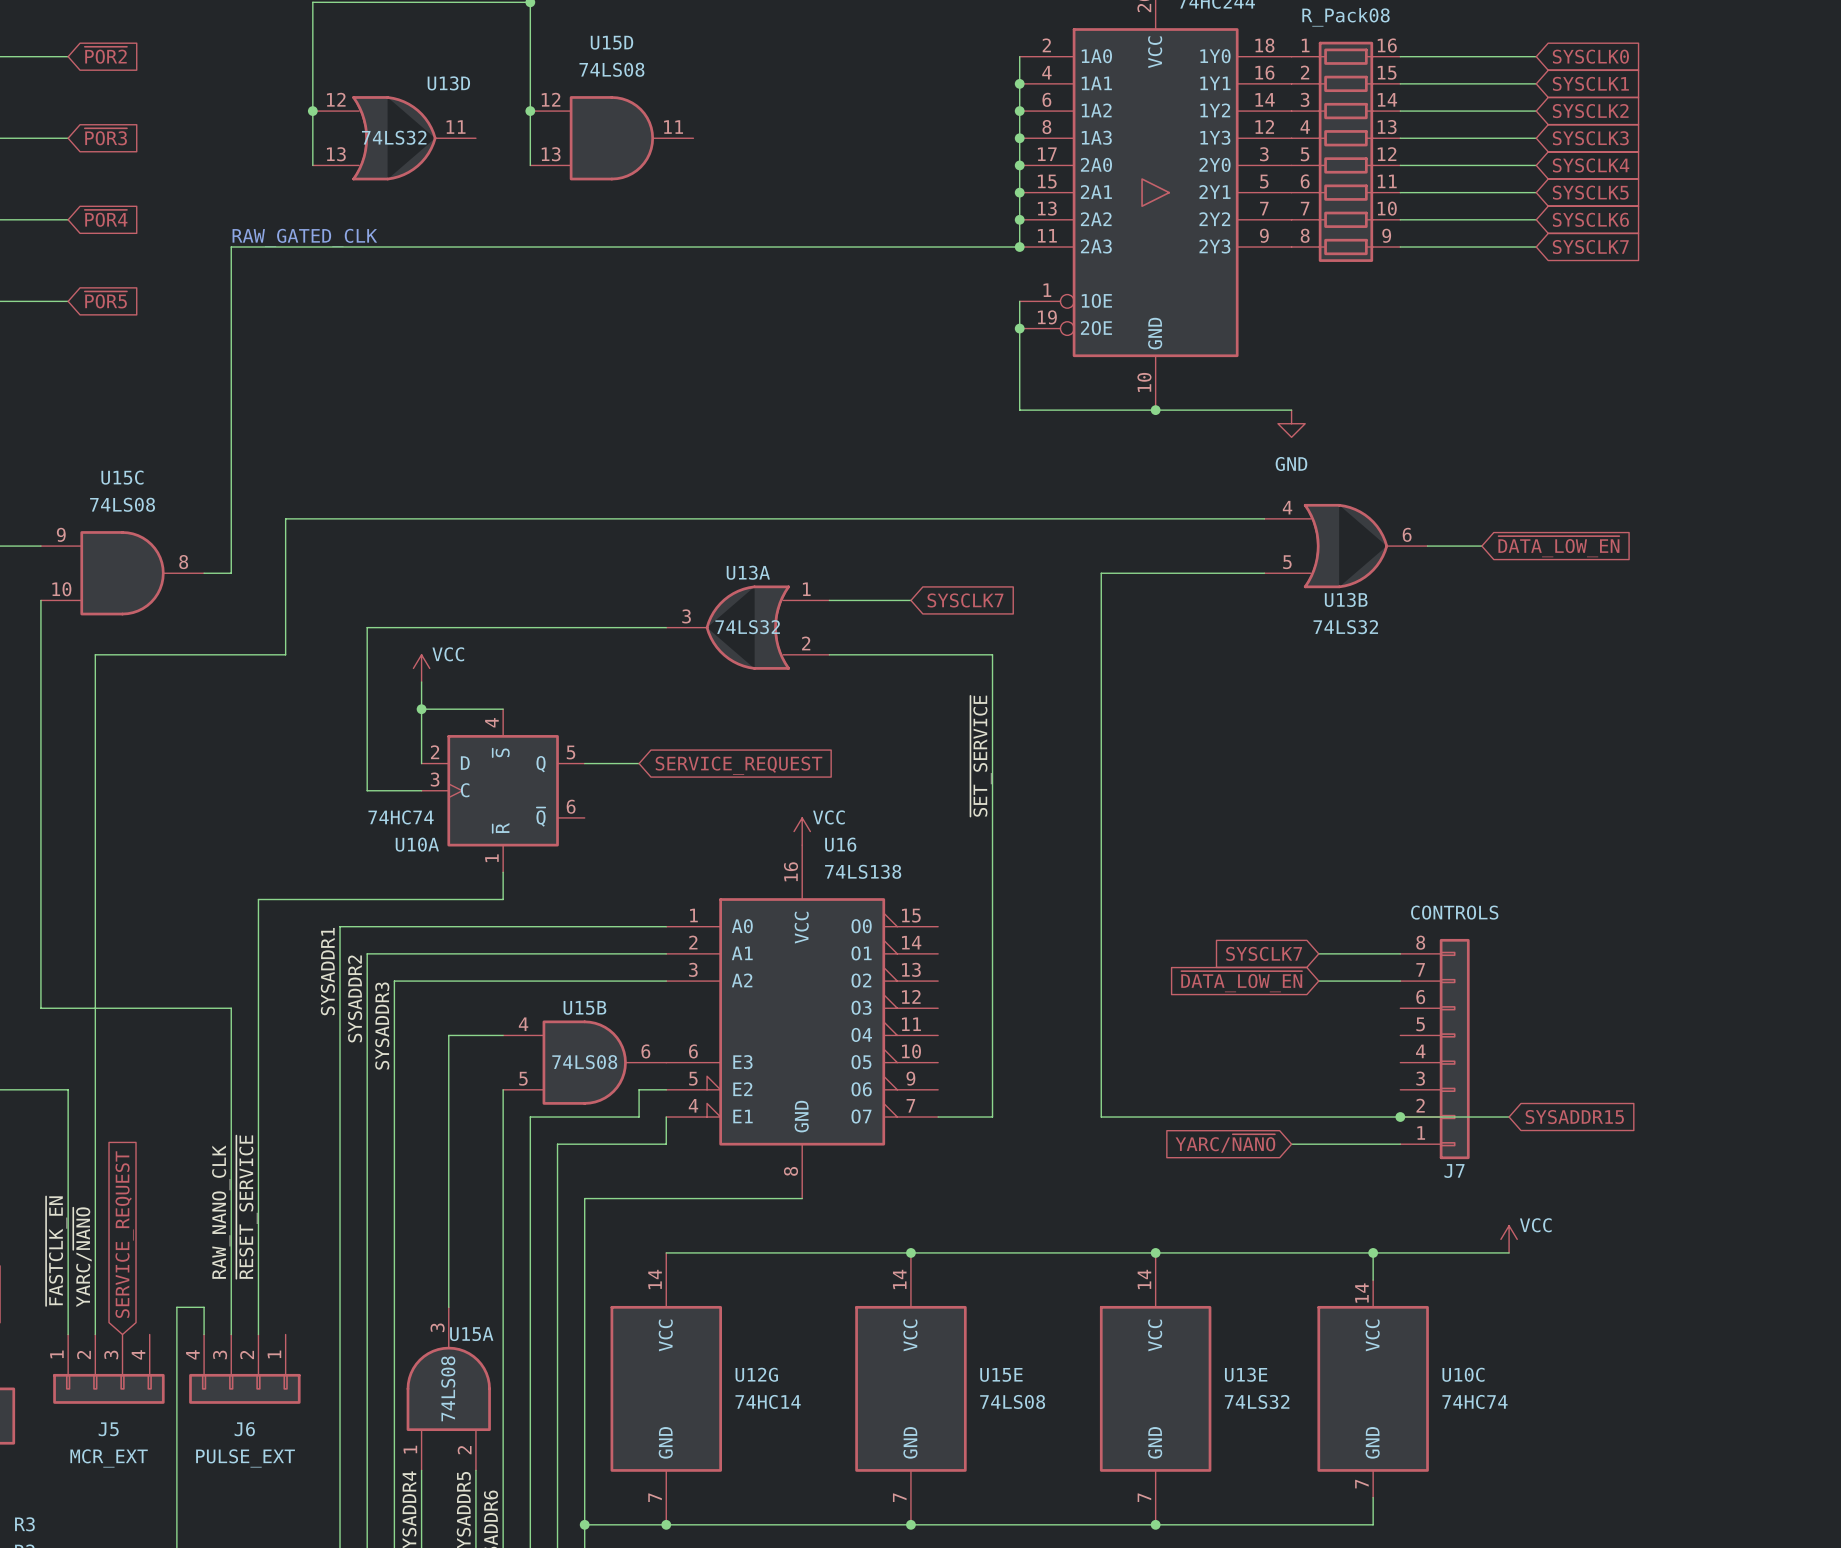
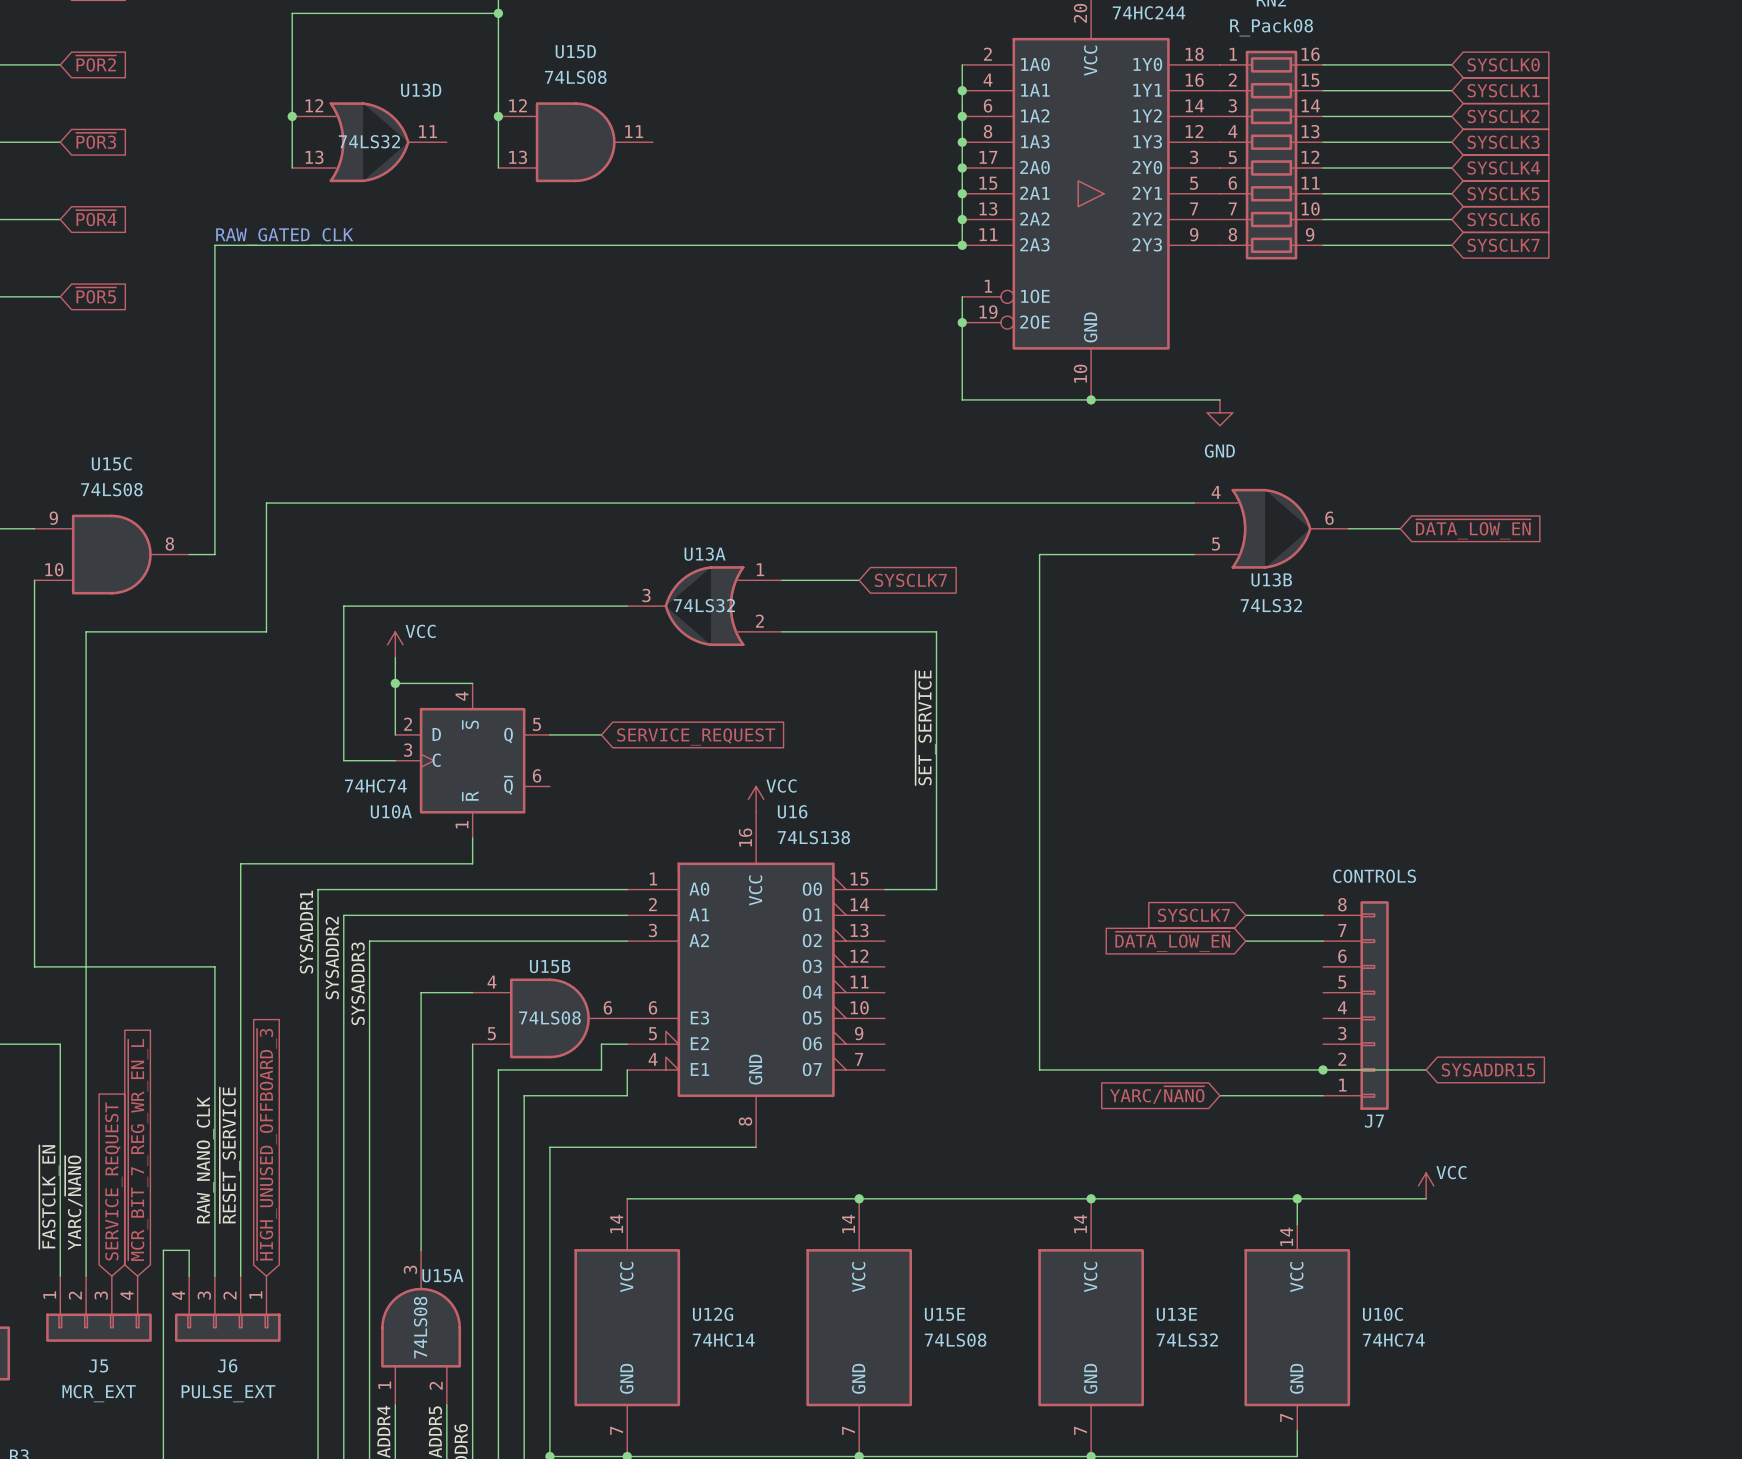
wire: (992, 926) (992, 1117) (938, 1117) -> (936, 889) (884, 889)
global label: none -> ~{HIGH_UNUSED_OFFBOARD_3} (267, 1144)
global label: none -> ~{MCR_BIT_7_REG_WR_EN_L} (138, 1149)

